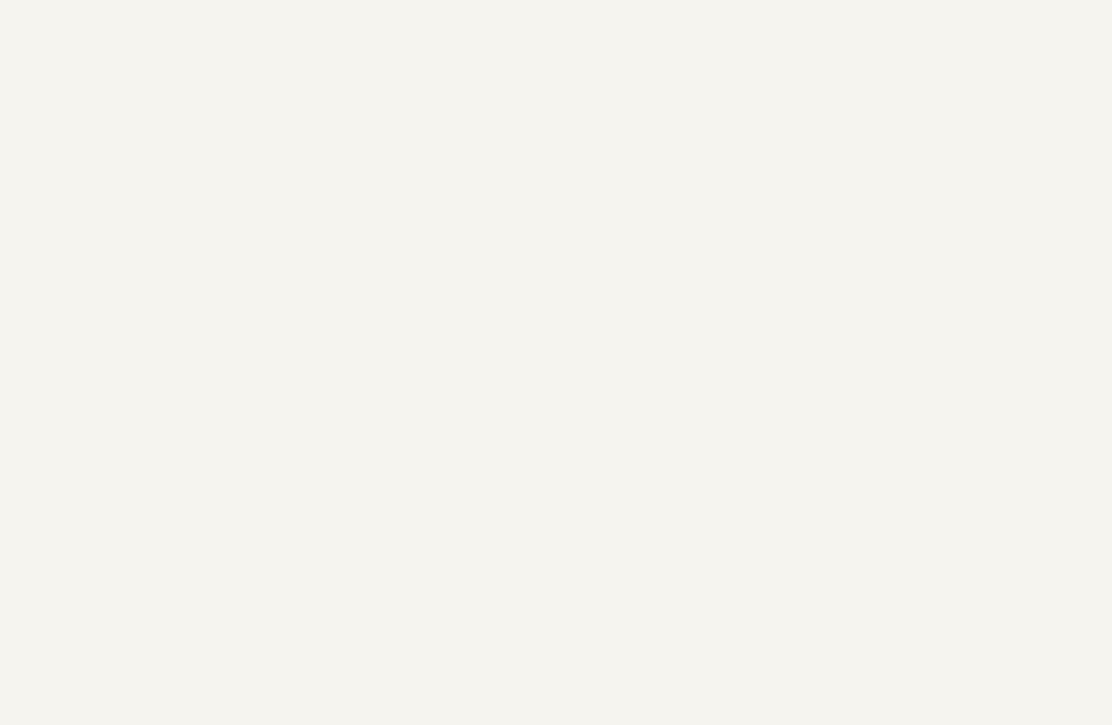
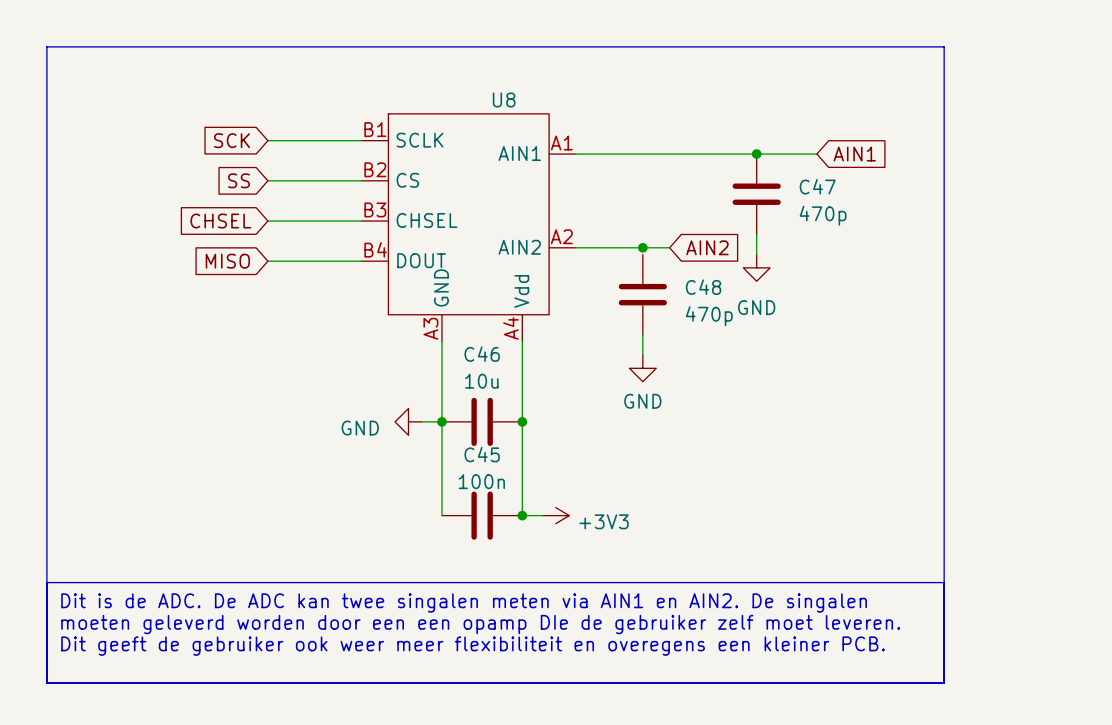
line: none -> (46, 46) (944, 46) (944, 683) (46, 683) (46, 46)
global label: none -> SCK (231, 140)
wire: none -> (267, 140) (361, 140)
wire: none -> (575, 154) (816, 154)
junction: none -> (756, 154)
global label: none -> AIN1 (854, 154)
global label: none -> SS (239, 180)
wire: none -> (267, 180) (361, 180)
C47: none -> 470p (756, 194)
global label: none -> CHSEL (220, 221)
wire: none -> (267, 221) (361, 221)
U8: none -> (468, 227)
wire: none -> (756, 234) (756, 254)
wire: none -> (575, 247) (669, 247)
junction: none -> (642, 247)
global label: none -> AIN2 (707, 247)
global label: none -> MISO (227, 261)
wire: none -> (267, 261) (361, 261)
power symbol: none -> GND (756, 267)
C48: none -> 470p (642, 294)
wire: none -> (642, 334) (642, 354)
wire: none -> (441, 341) (441, 515)
wire: none -> (522, 341) (522, 515) (542, 515)
power symbol: none -> GND (642, 368)
power symbol: none -> GND (408, 421)
wire: none -> (421, 421) (441, 421)
junction: none -> (441, 421)
C46: none -> 10u (482, 421)
junction: none -> (522, 421)
C45: none -> 100n (482, 515)
junction: none -> (522, 515)
power symbol: none -> +3V3 (555, 515)
line: none -> (46, 582) (944, 582)
text: none -> Dit is de ADC. De ADC kan twee singalen meten via AIN1 en AIN2. De singalen (464, 603)
text: none -> moeten geleverd worden door een een opamp DIe de gebruiker zelf moet leveren. (480, 624)
text: none -> Dit geeft de gebruiker ook weer meer flexibiliteit en overegens een kleiner PCB. (473, 646)

